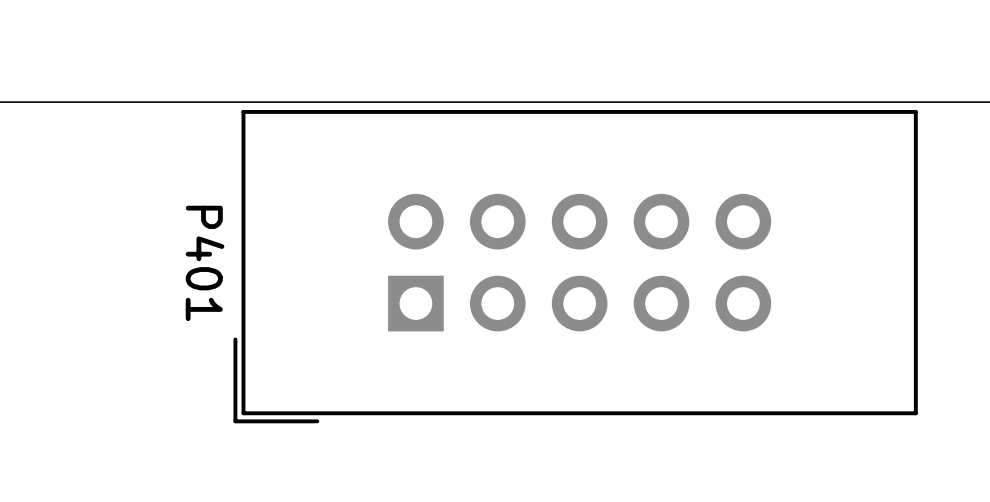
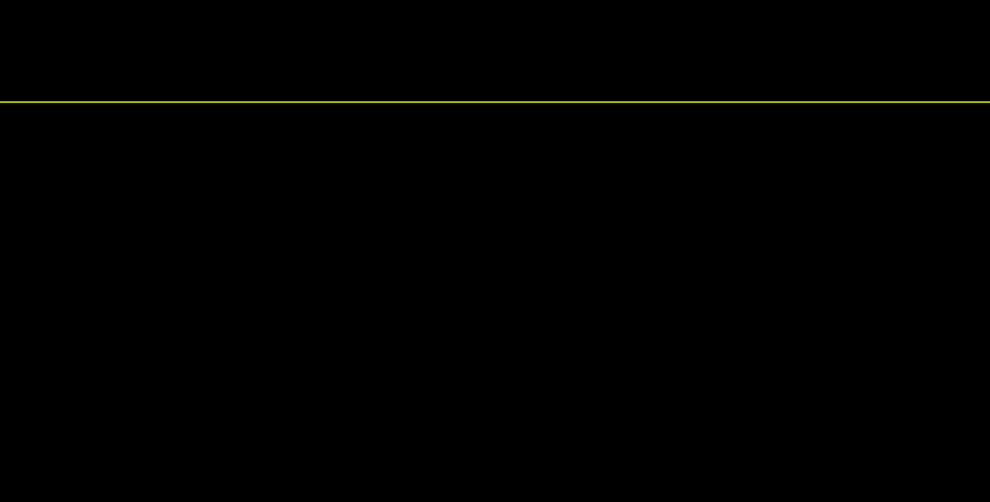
P401: (575, 266) -> none

